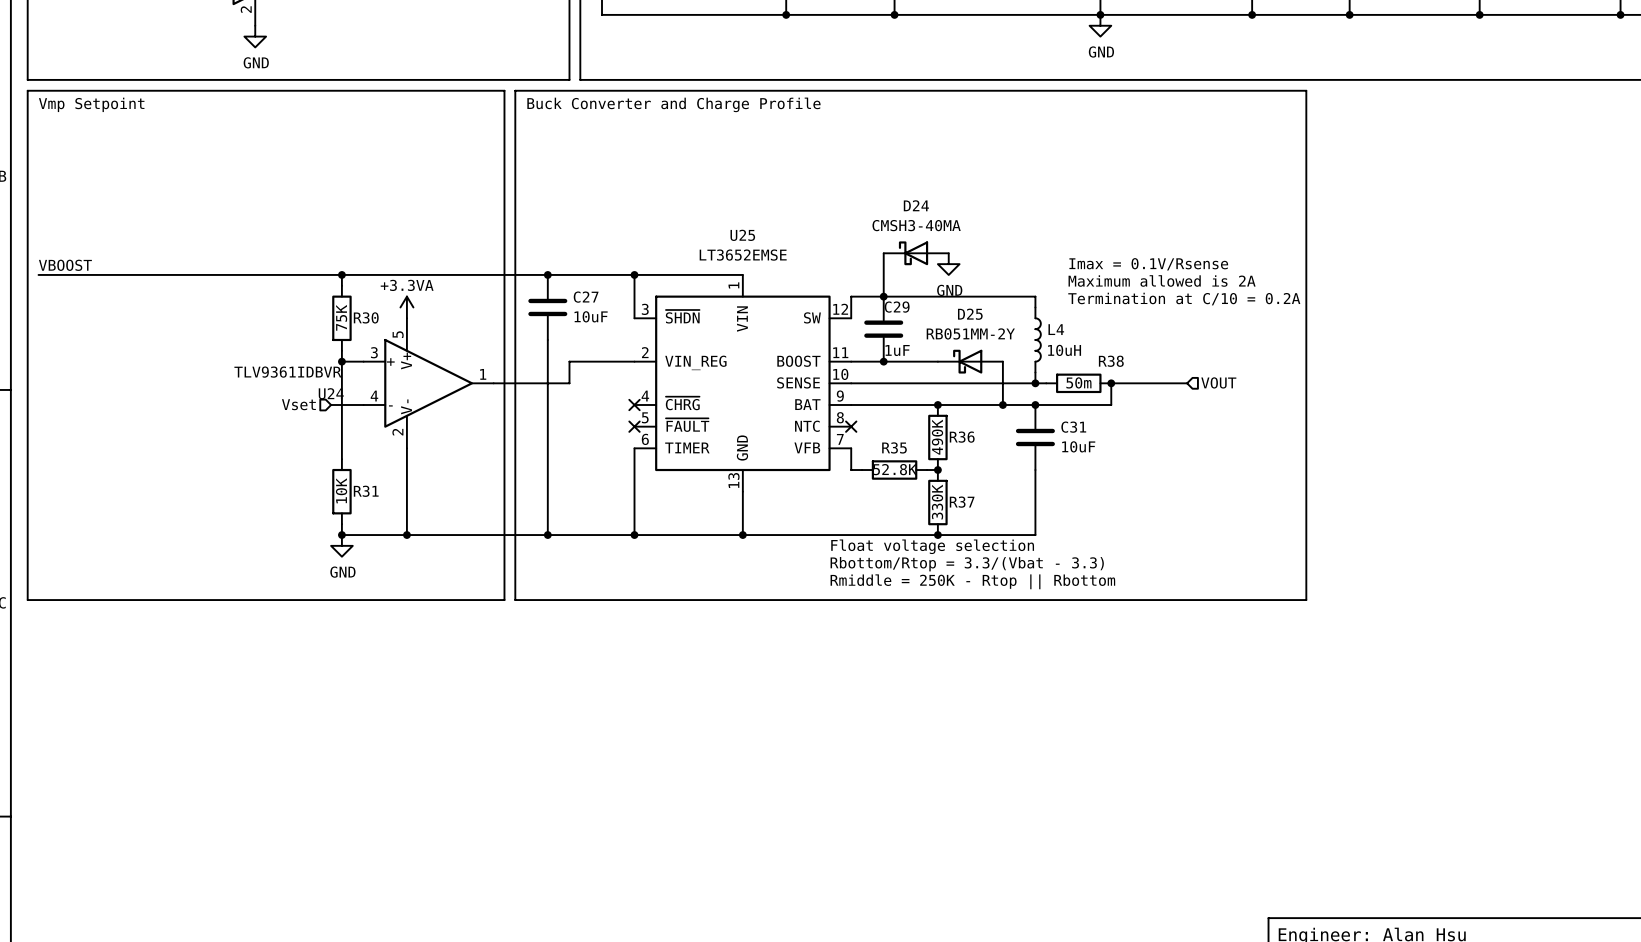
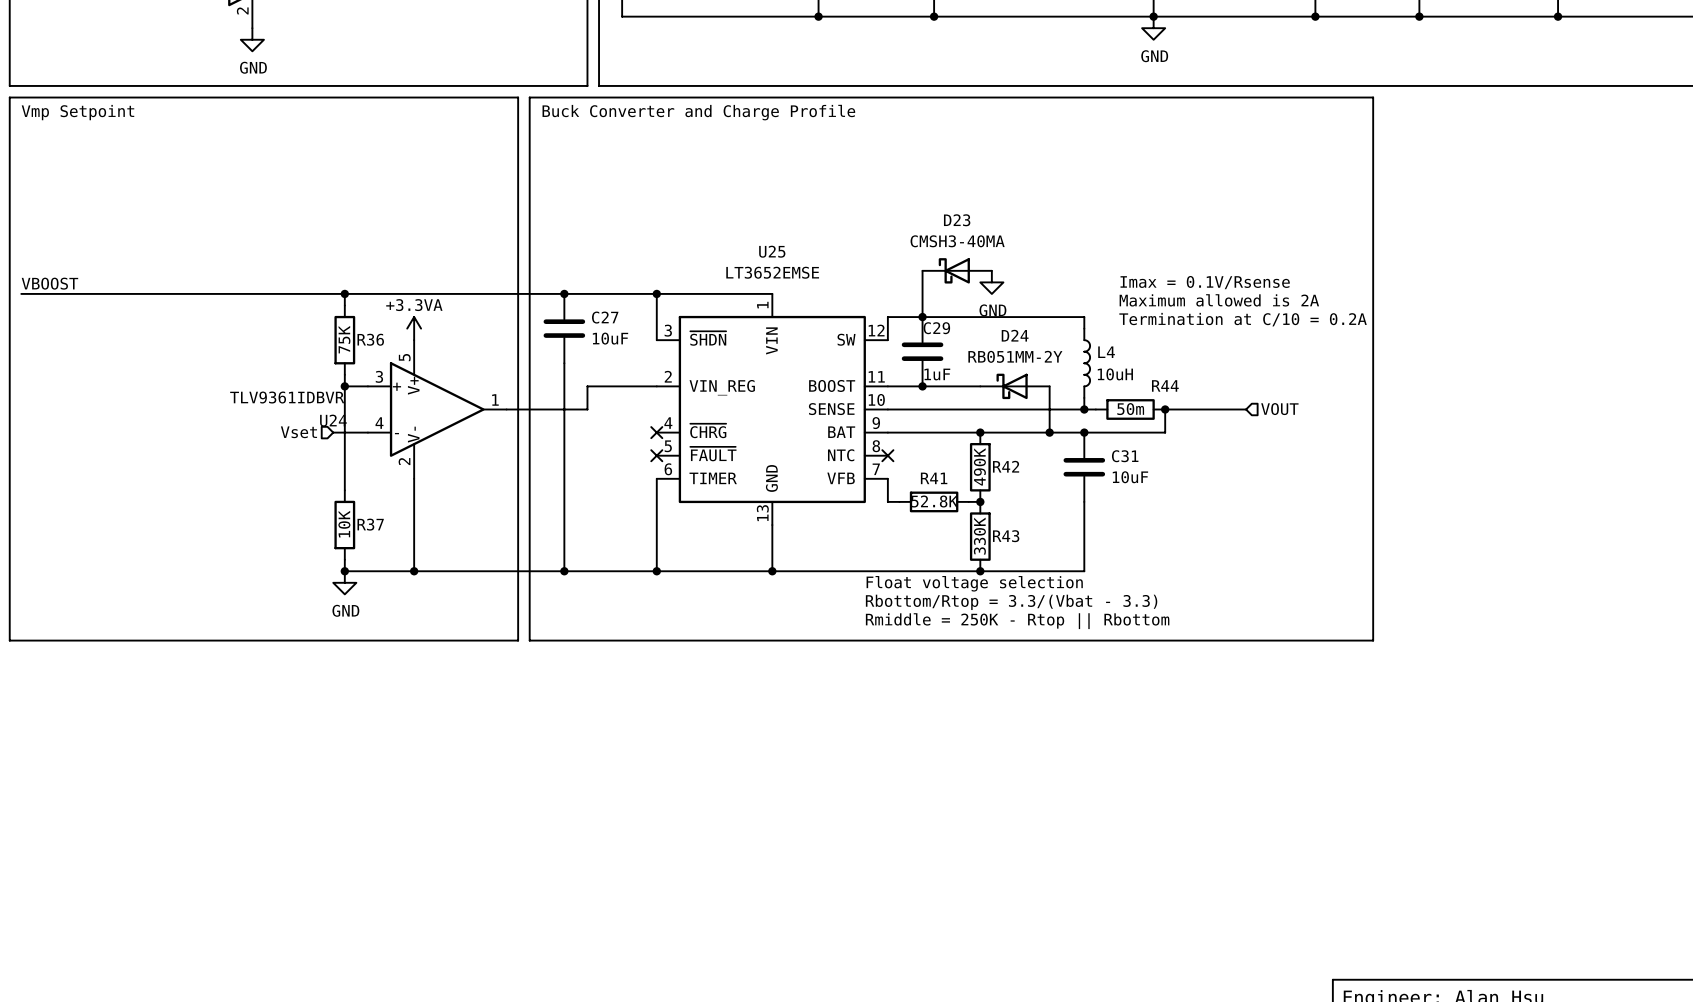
D24 name: D24 (916, 205) -> D23 (957, 220)
D25 name: D25 (970, 314) -> D24 (1015, 335)
R30 name: R30 (366, 317) -> R36 (370, 339)
R38 name: R38 (1111, 361) -> R44 (1165, 385)
R36 name: R36 (962, 437) -> R42 (1006, 466)
R35 name: R35 (894, 447) -> R41 (934, 478)
R31 name: R31 (366, 491) -> R37 (370, 524)
R37 name: R37 (962, 502) -> R43 (1006, 536)

